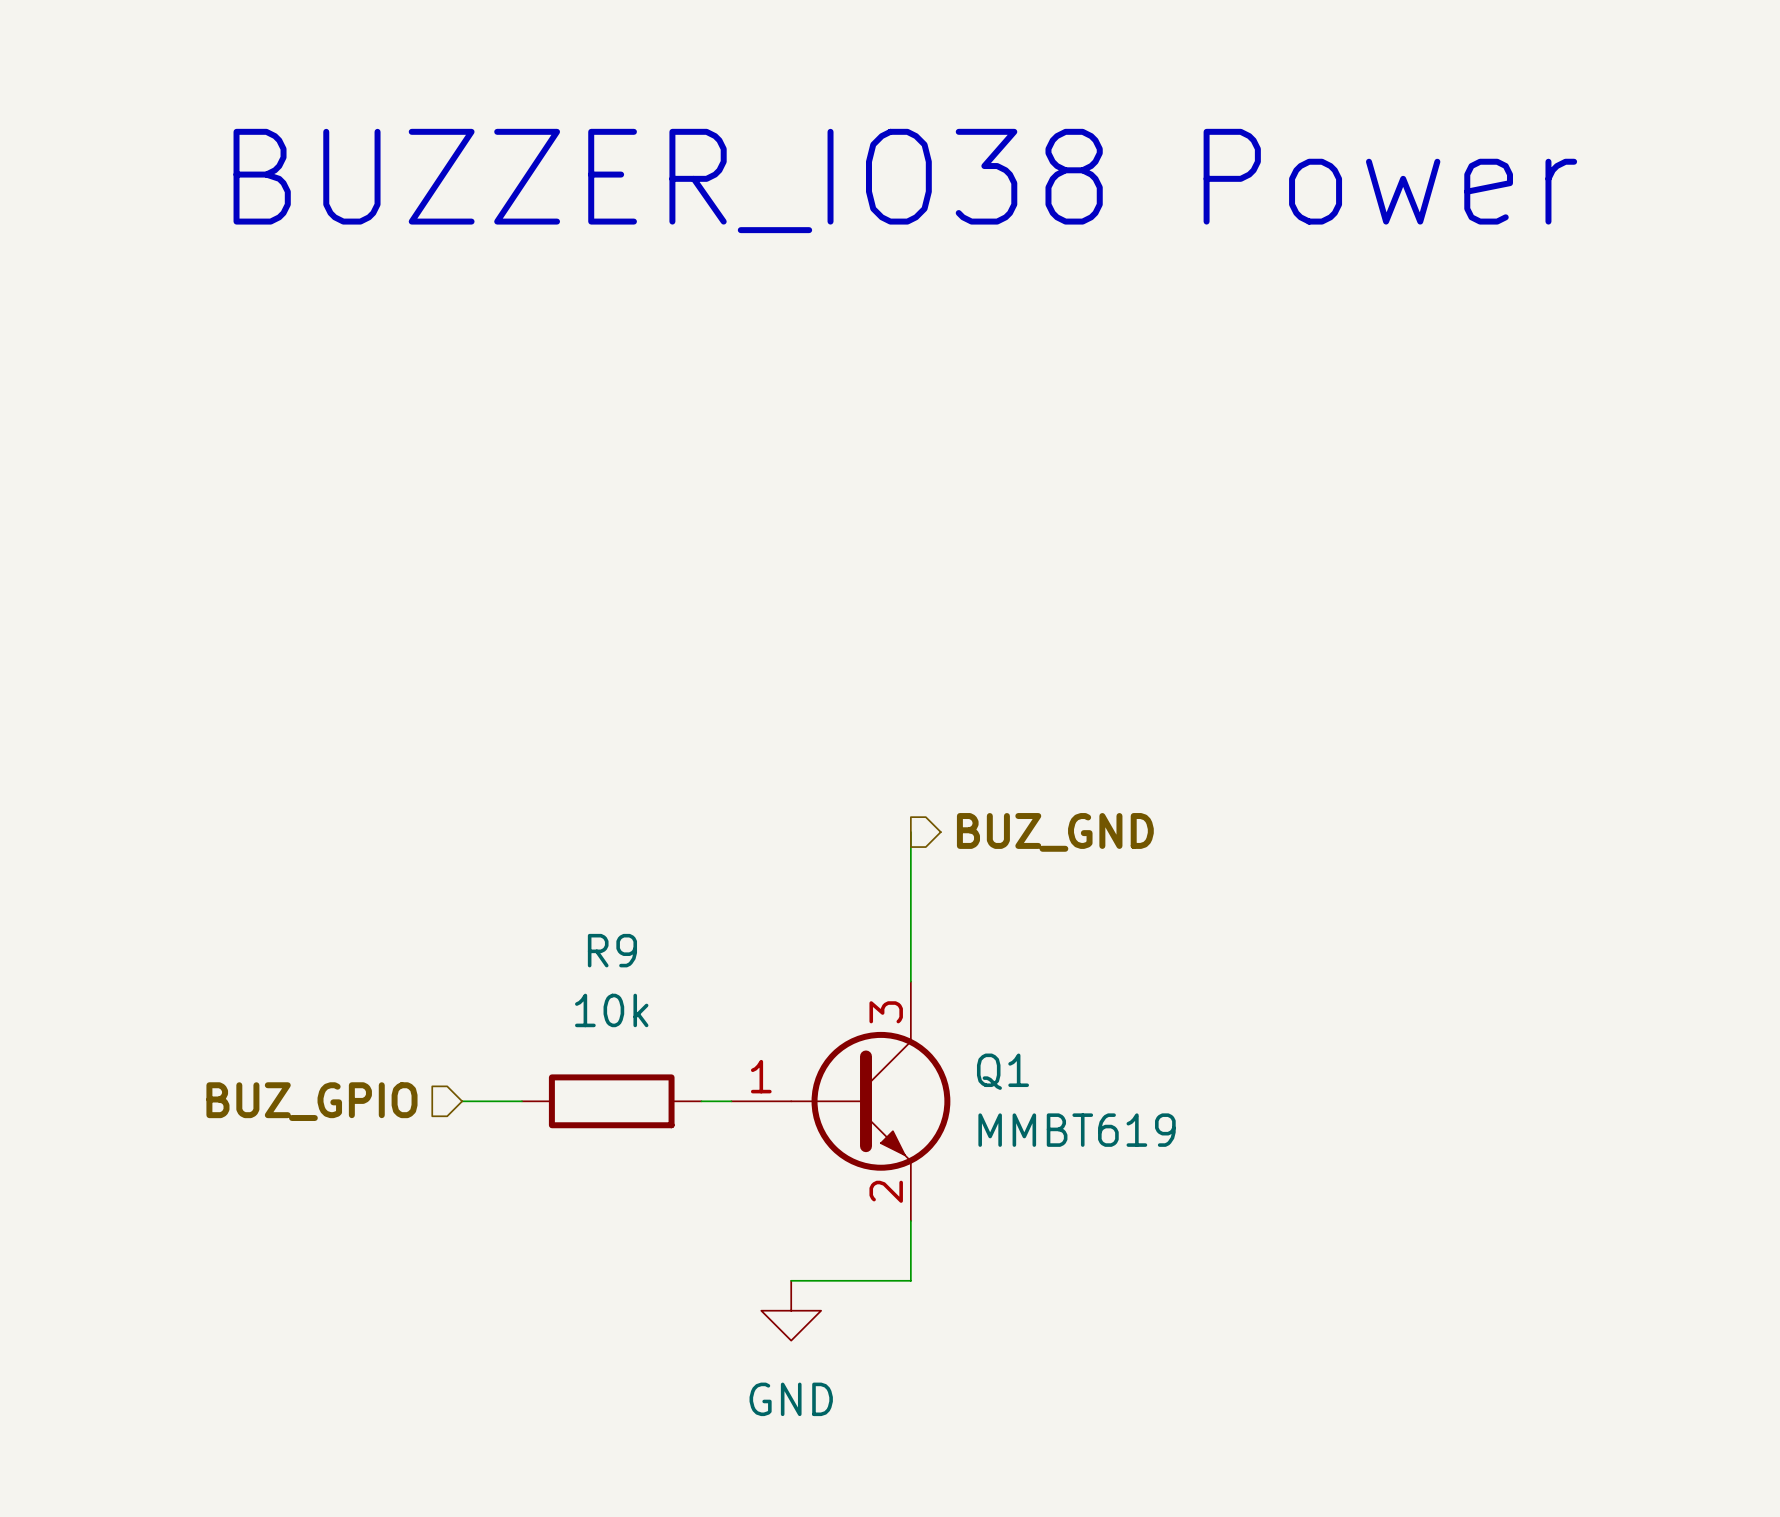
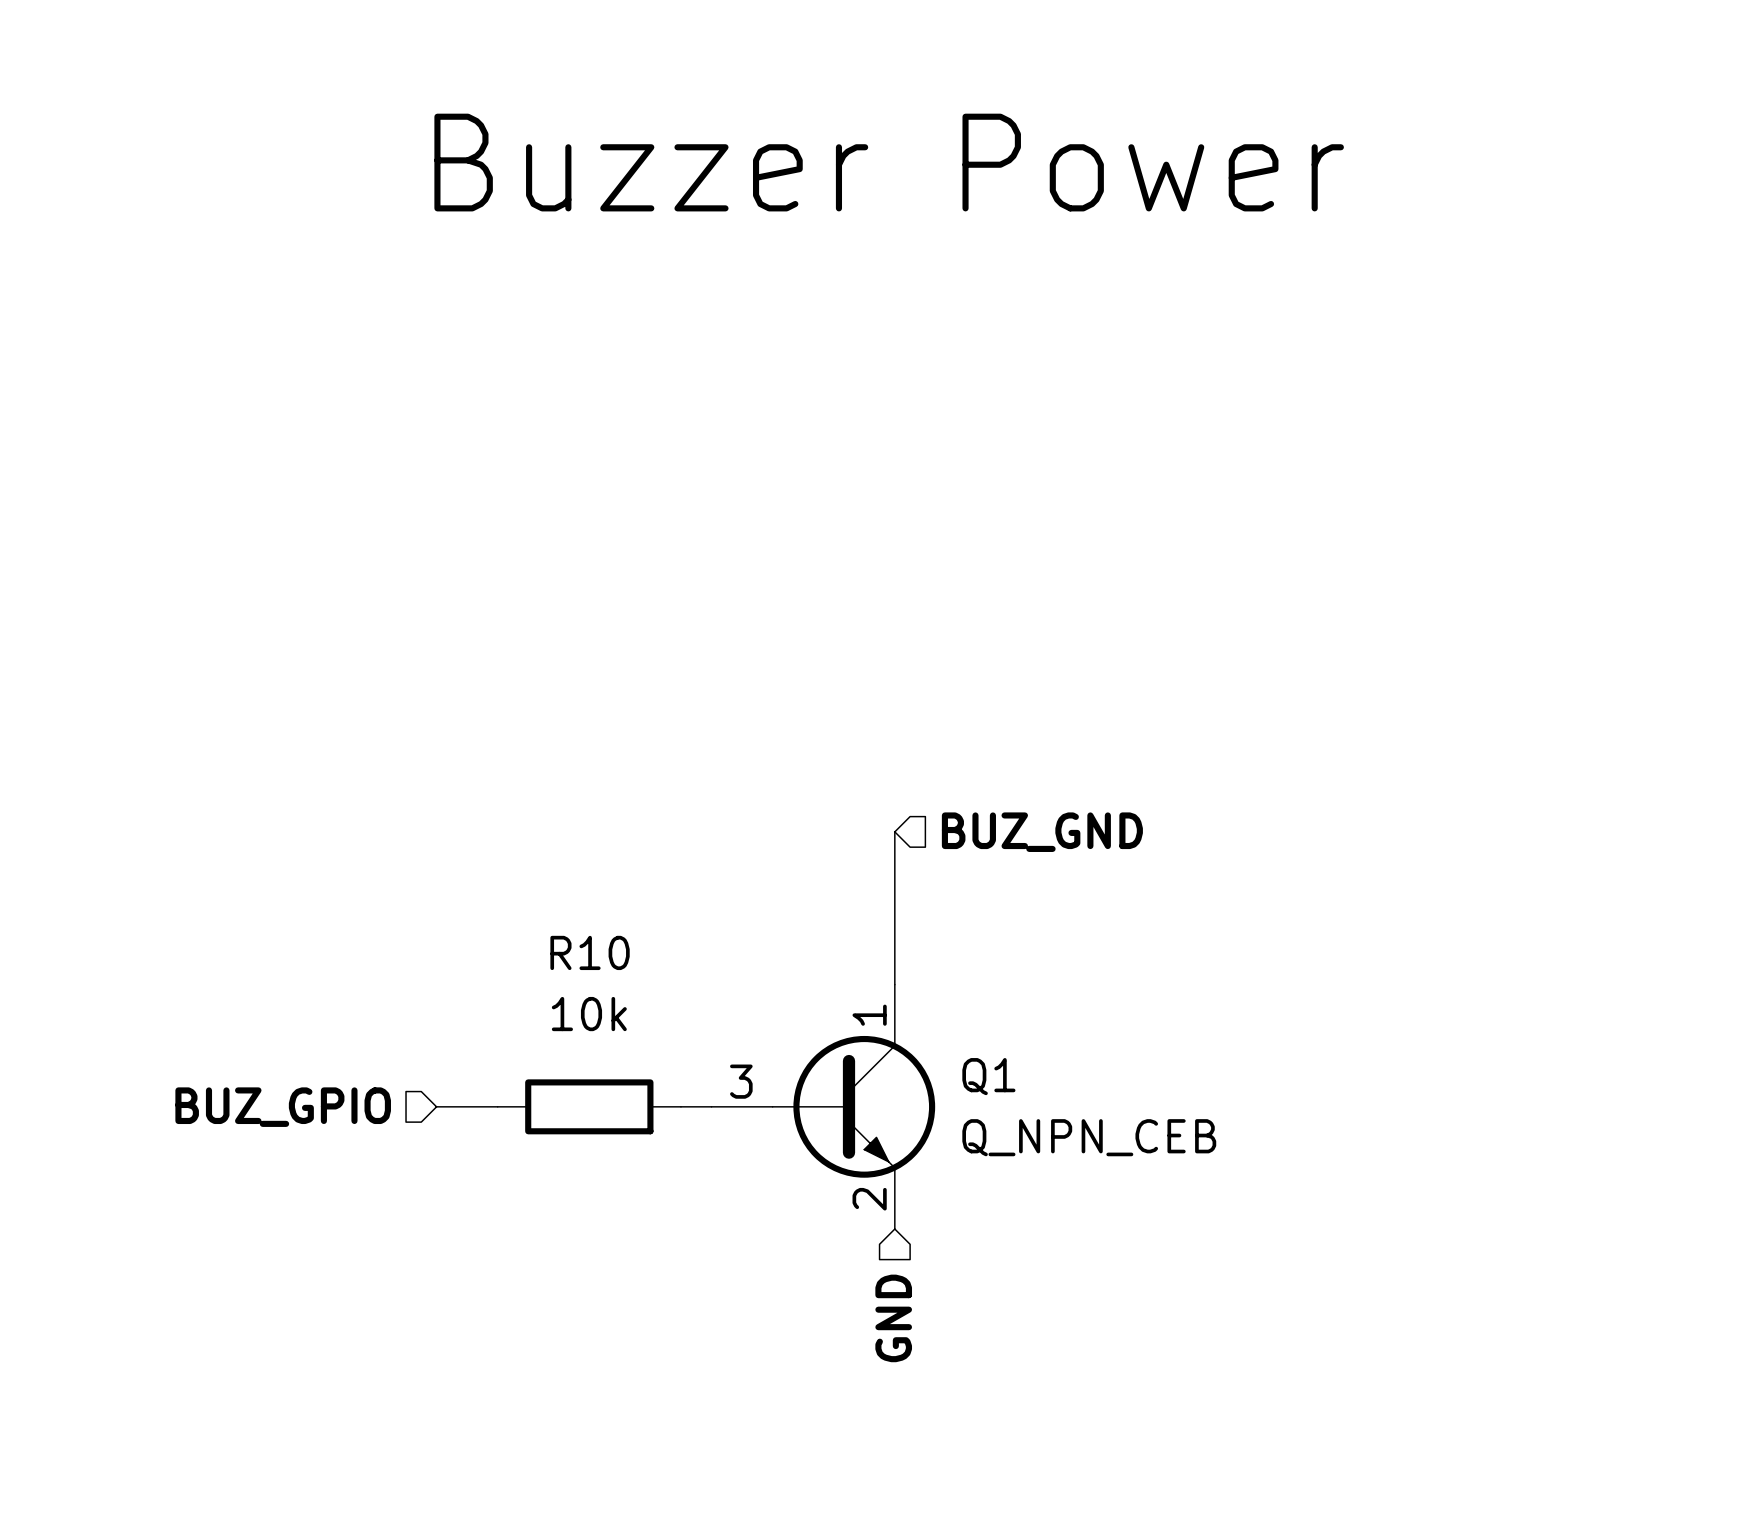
text: BUZZER_IO38 Power (905, 180) -> Buzzer Power (889, 162)
hierarchical label shape: output (1055, 832) -> input (1042, 832)
R9 name: R9 (612, 950) -> R10 (590, 952)
Q1 pin number: 3 (886, 1012) -> 1 (869, 1015)
Q1 pin number: 1 (761, 1076) -> 3 (741, 1081)
Q1 value: MMBT619 (1077, 1130) -> Q_NPN_CEB (1089, 1137)
wire: (910, 1220) (910, 1280) (791, 1280) -> none
hierarchical label: none -> GND (893, 1318)
power symbol: GND (791, 1310) -> none

